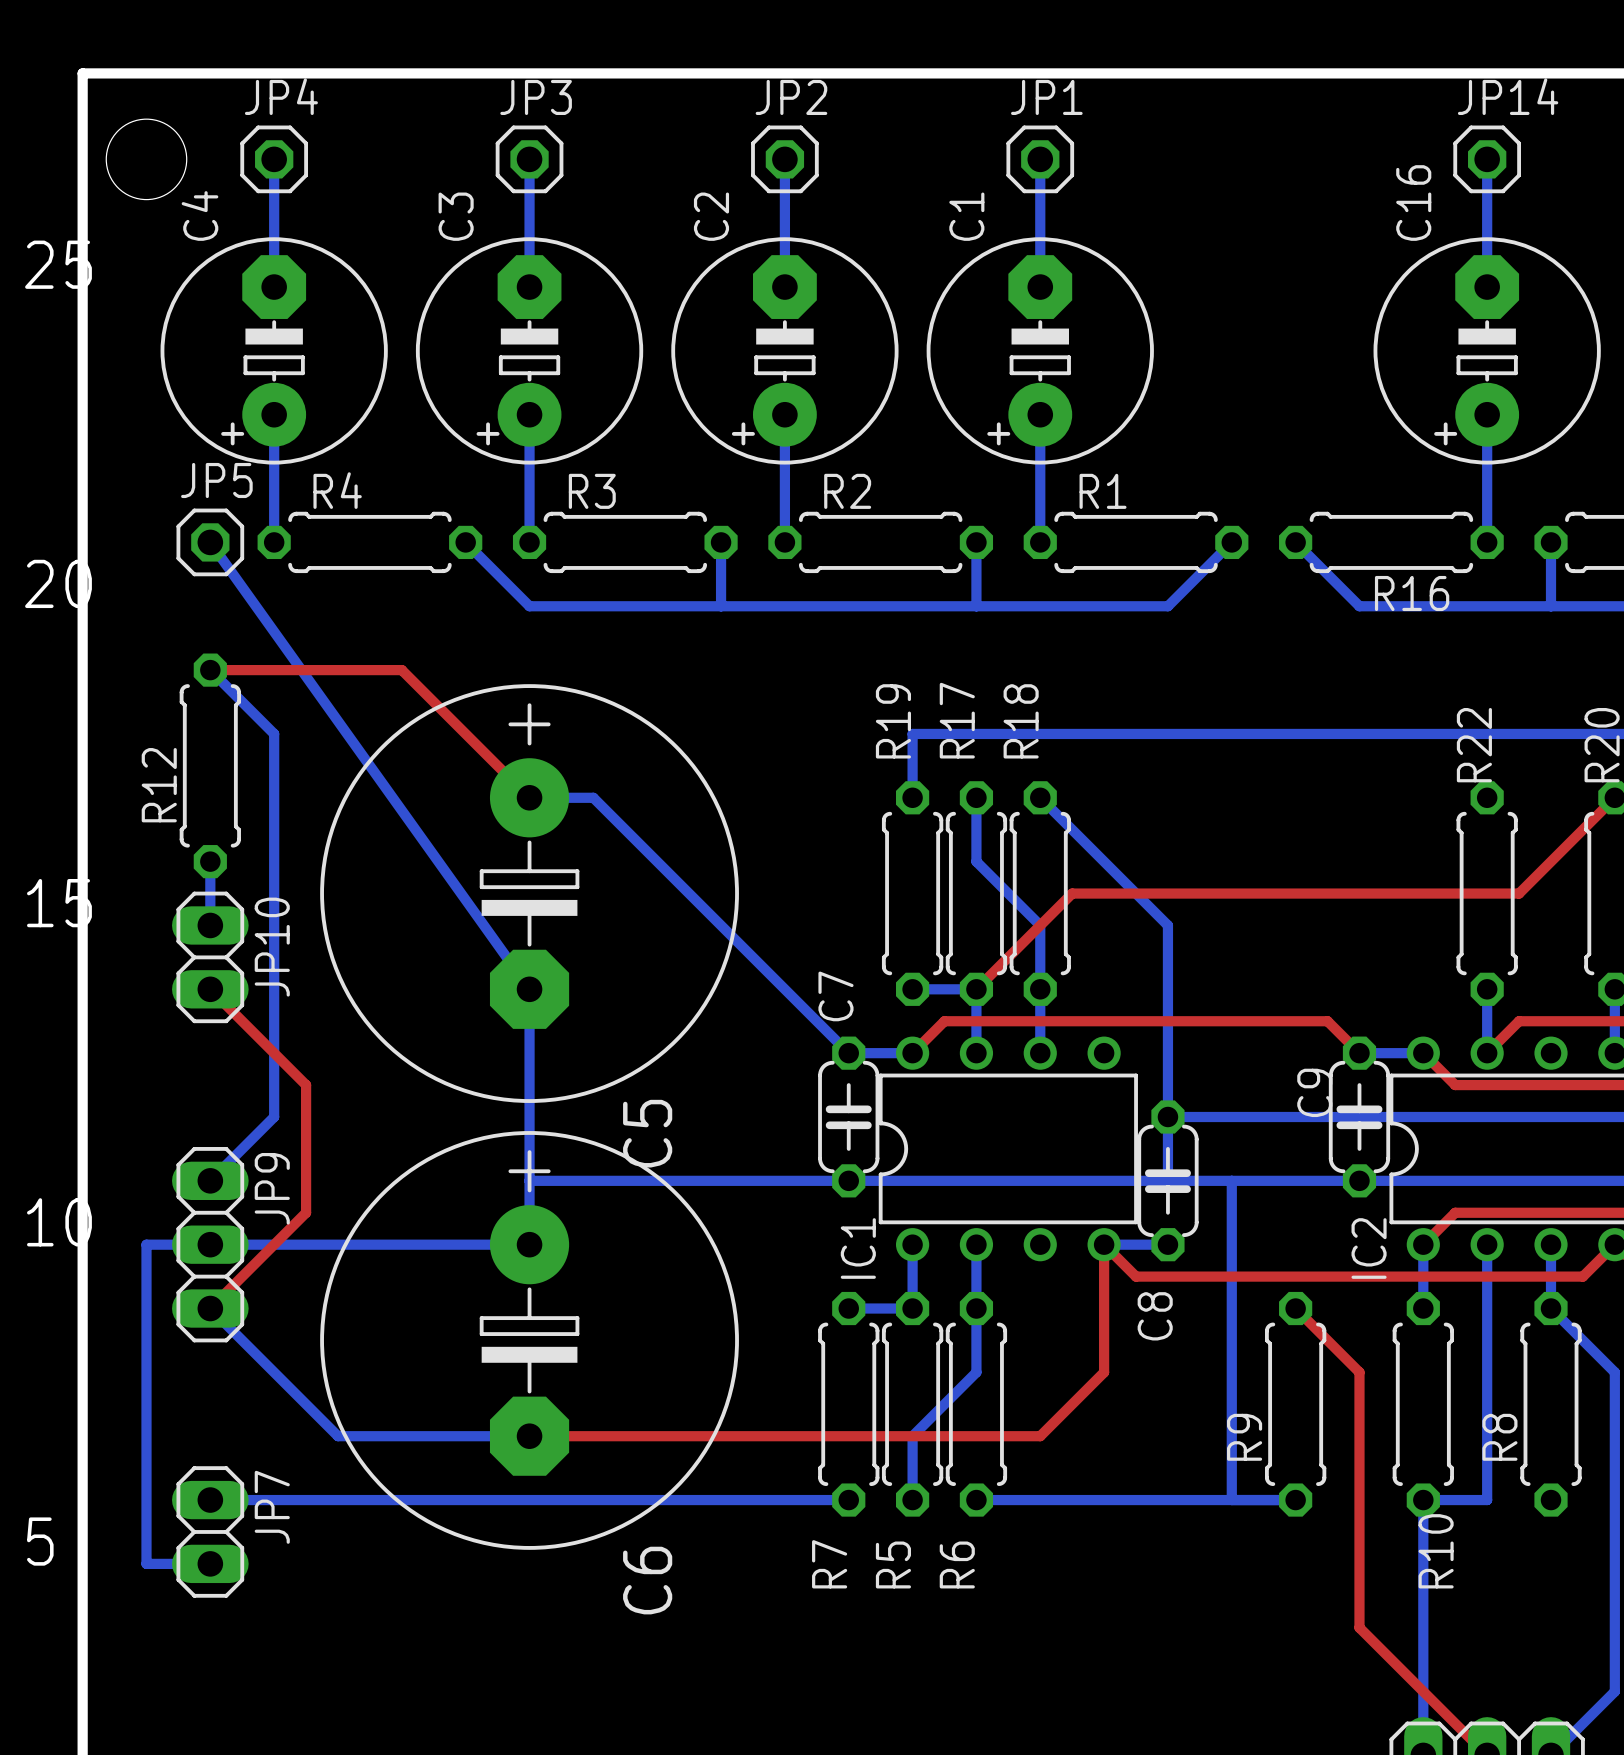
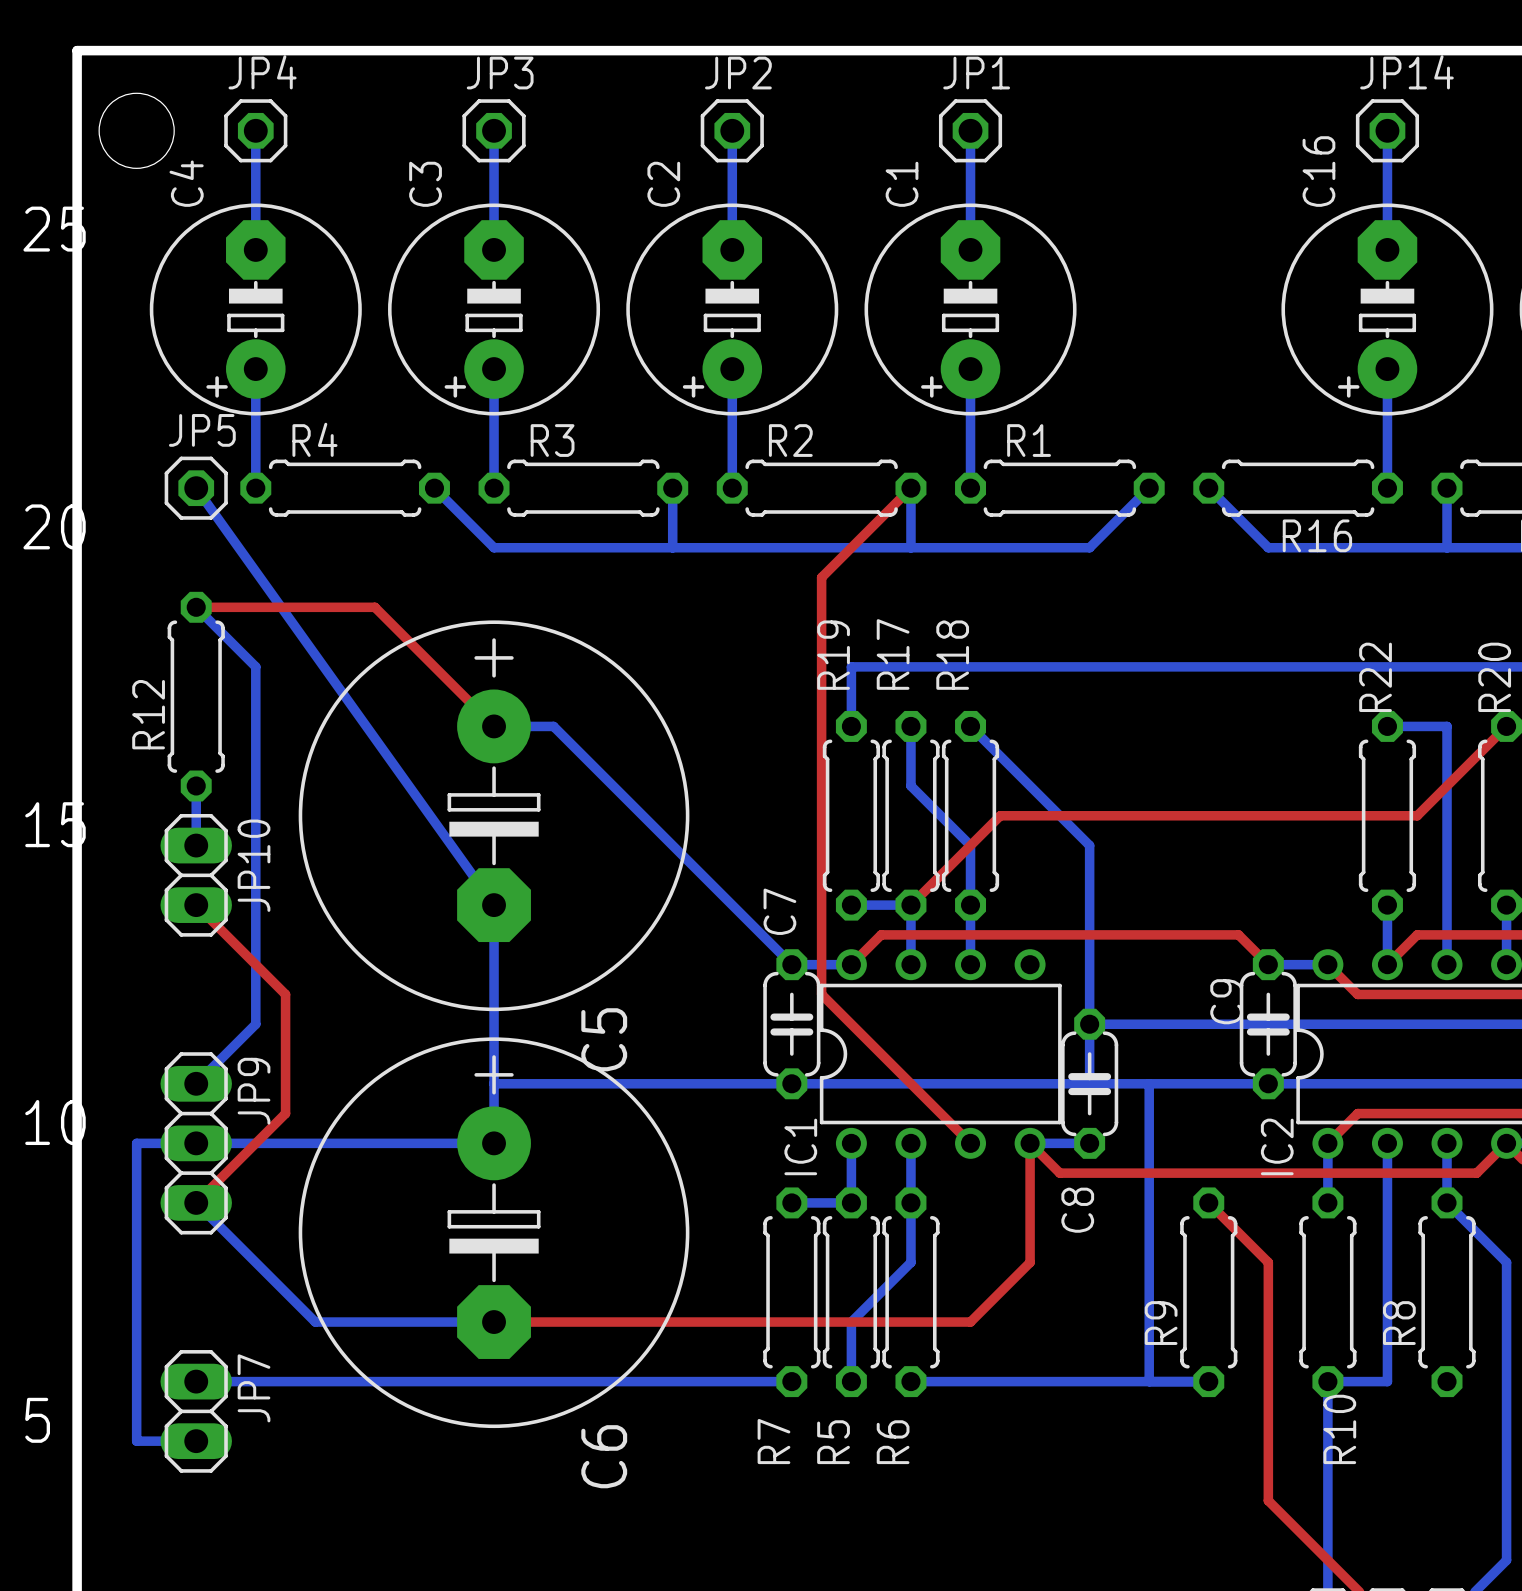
top track: none -> (910, 488) (821, 577) (821, 994) (970, 1143)
bottom track: none -> (1387, 726) (1447, 726) (1447, 964)

